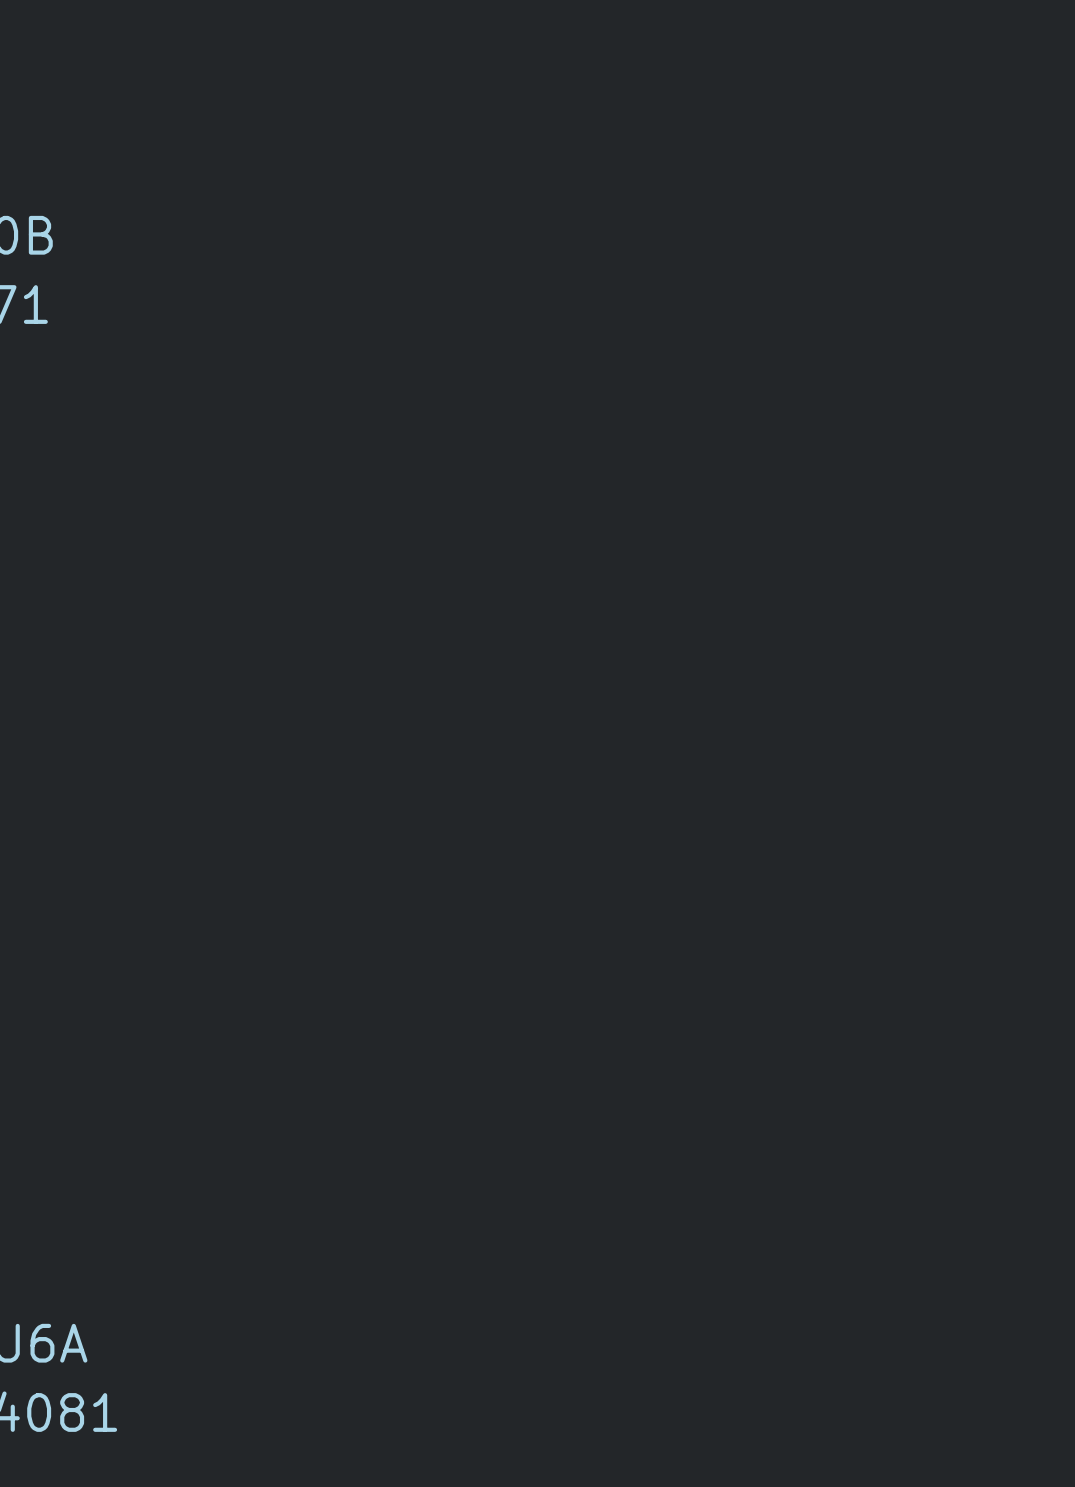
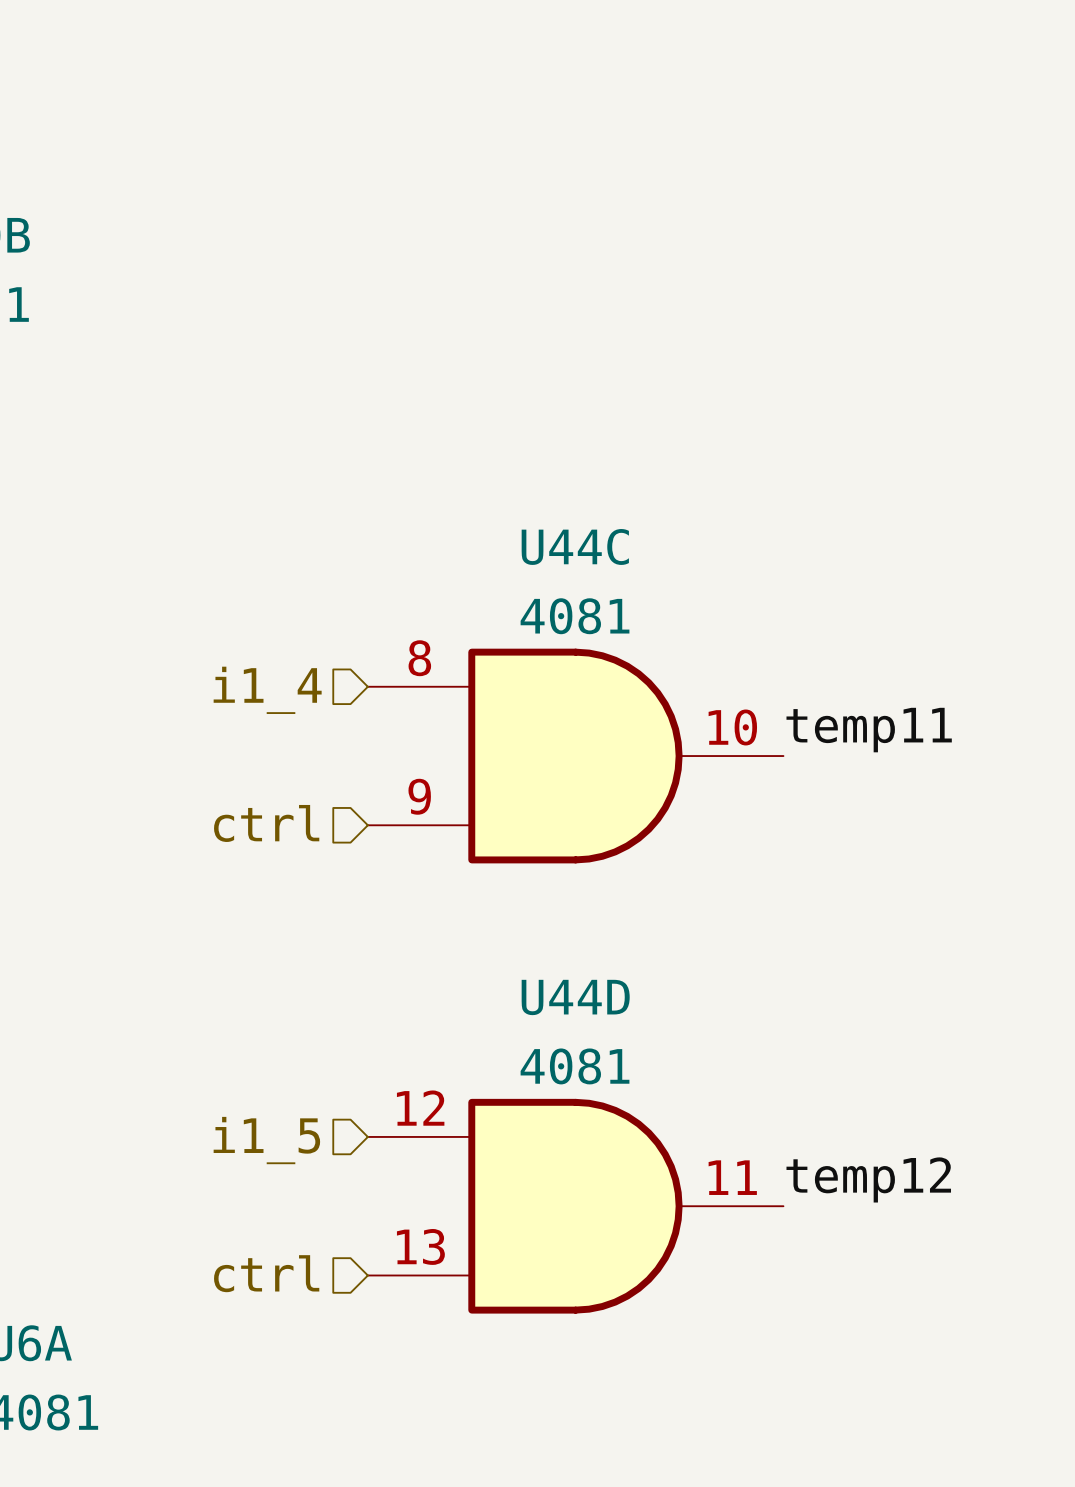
hierarchical label: none -> i1_4 (267, 690)
label: none -> temp11 (869, 730)
U44C: none -> 4081 (575, 756)
hierarchical label: none -> ctrl (266, 823)
hierarchical label: none -> i1_5 (266, 1140)
label: none -> temp12 (868, 1179)
U44D: none -> 4081 (575, 1206)
hierarchical label: none -> ctrl (266, 1273)

